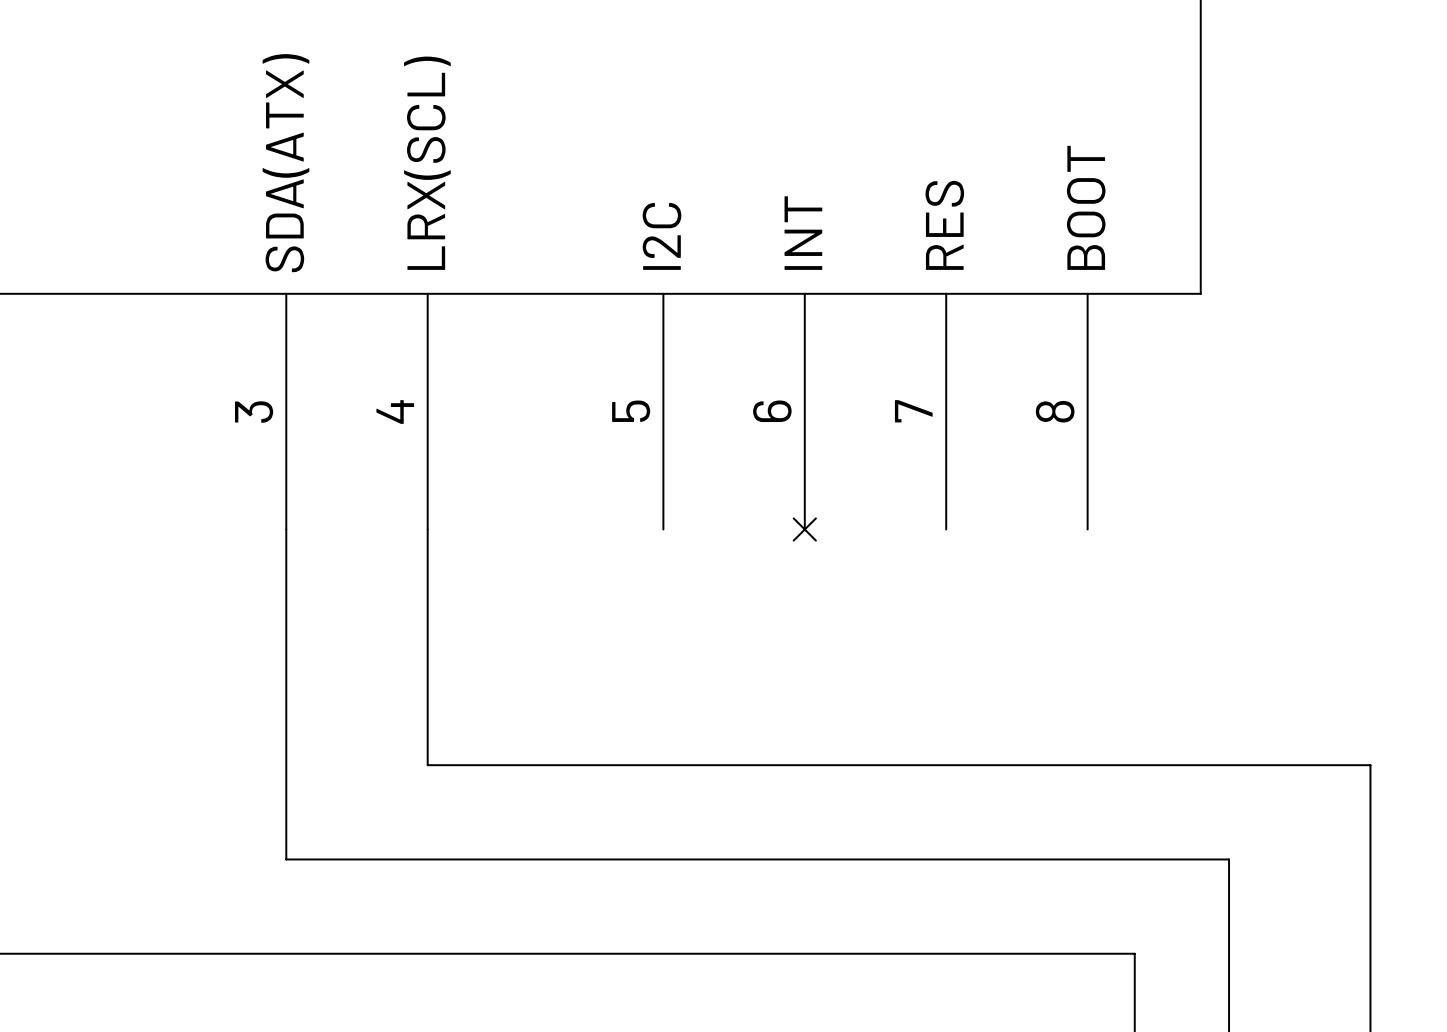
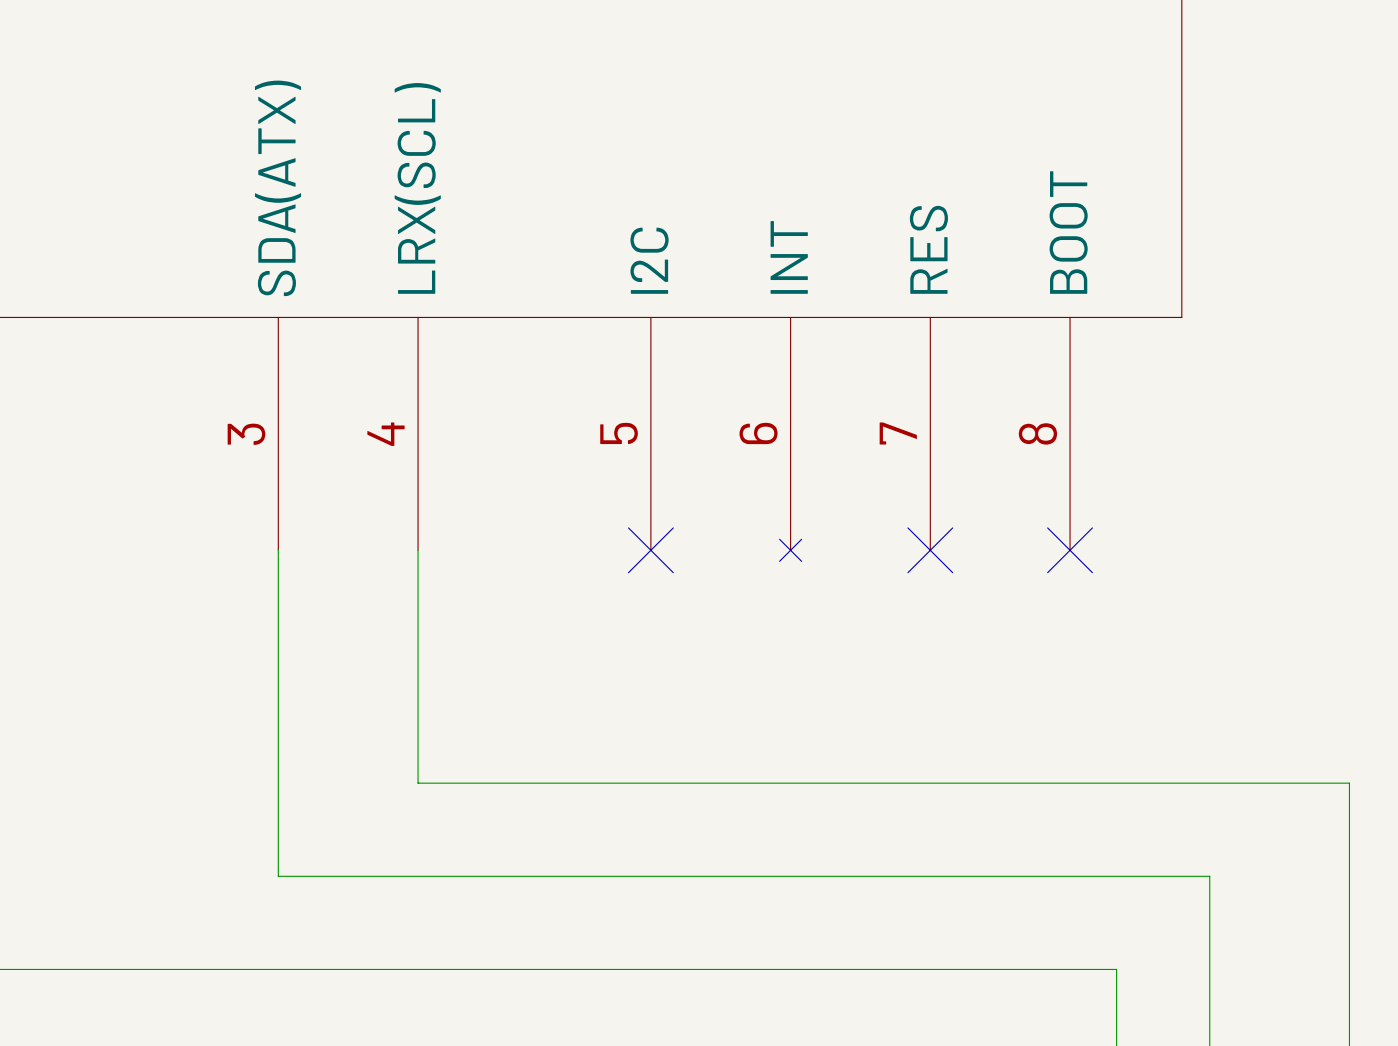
no-connect mark: none -> (650, 550)
no-connect mark: none -> (930, 550)
no-connect mark: none -> (1070, 550)

